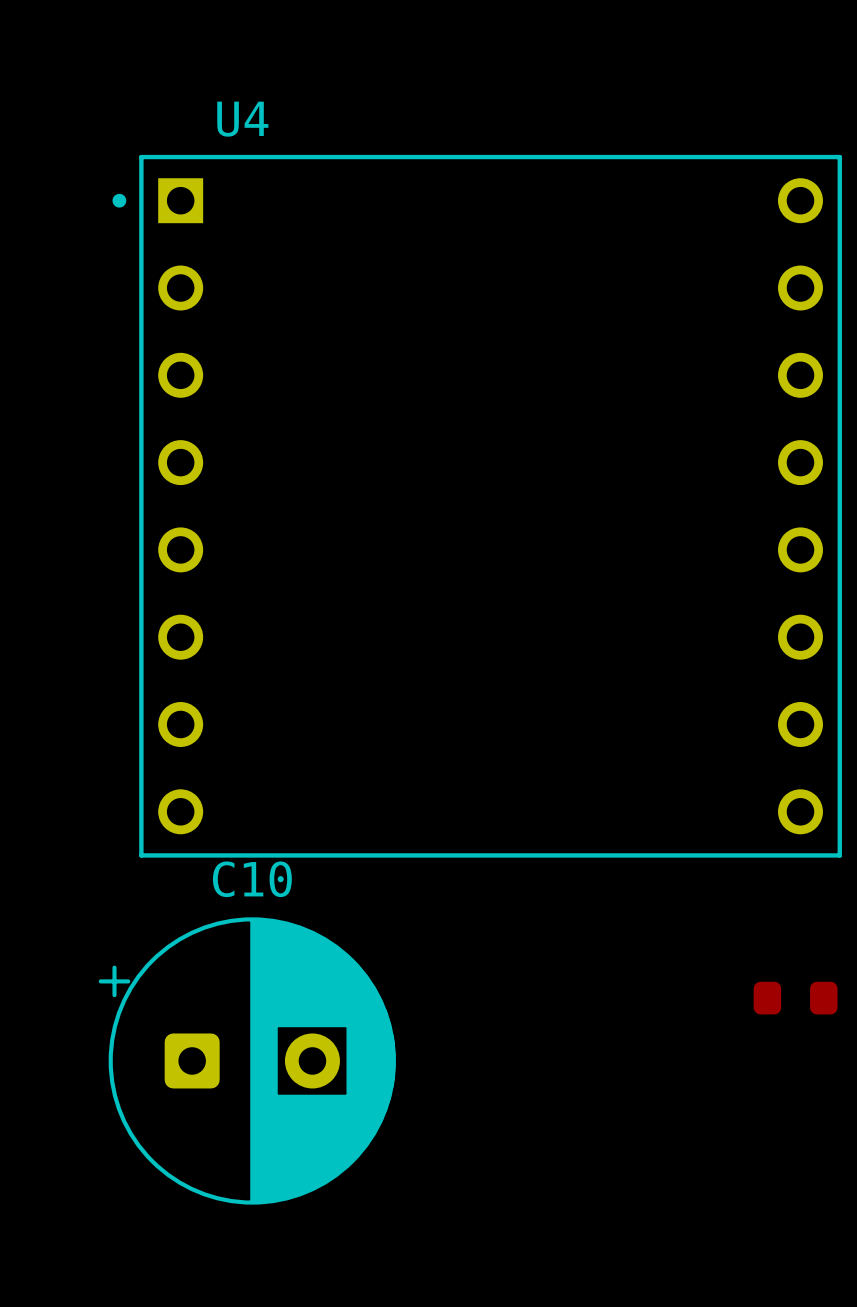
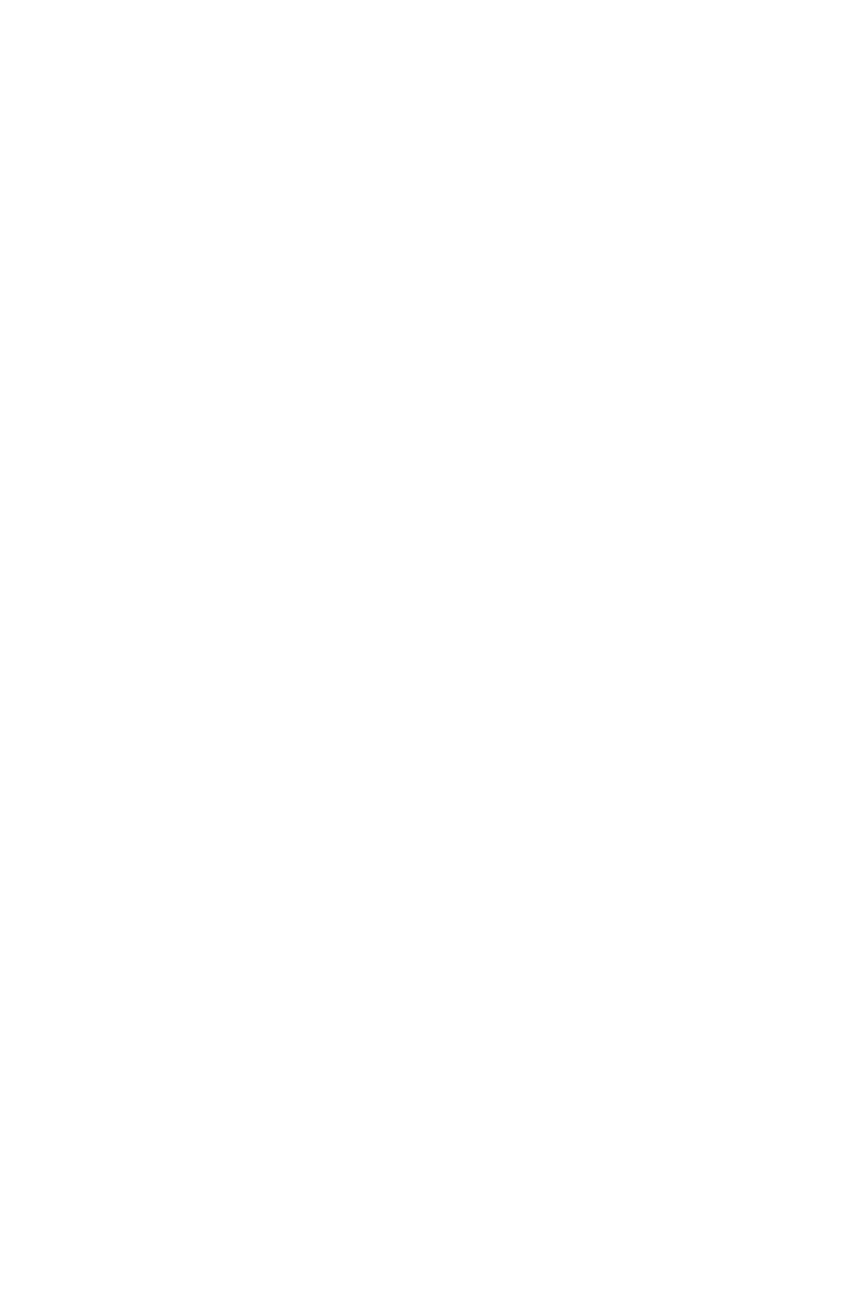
U4: (477, 506) -> none
part: (795, 998) -> none
C10: (247, 1060) -> none

